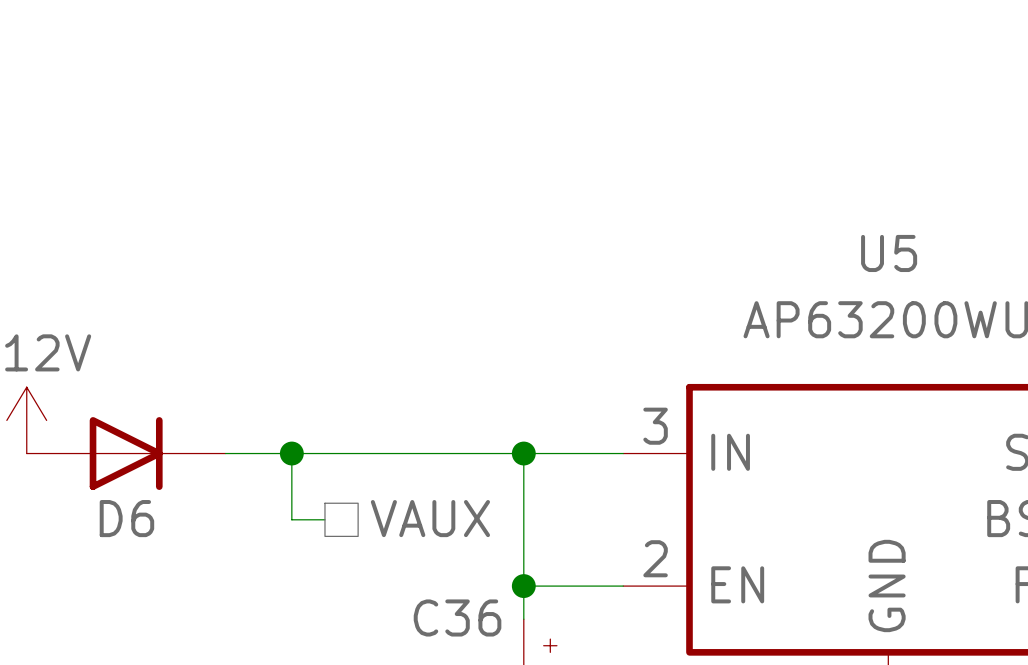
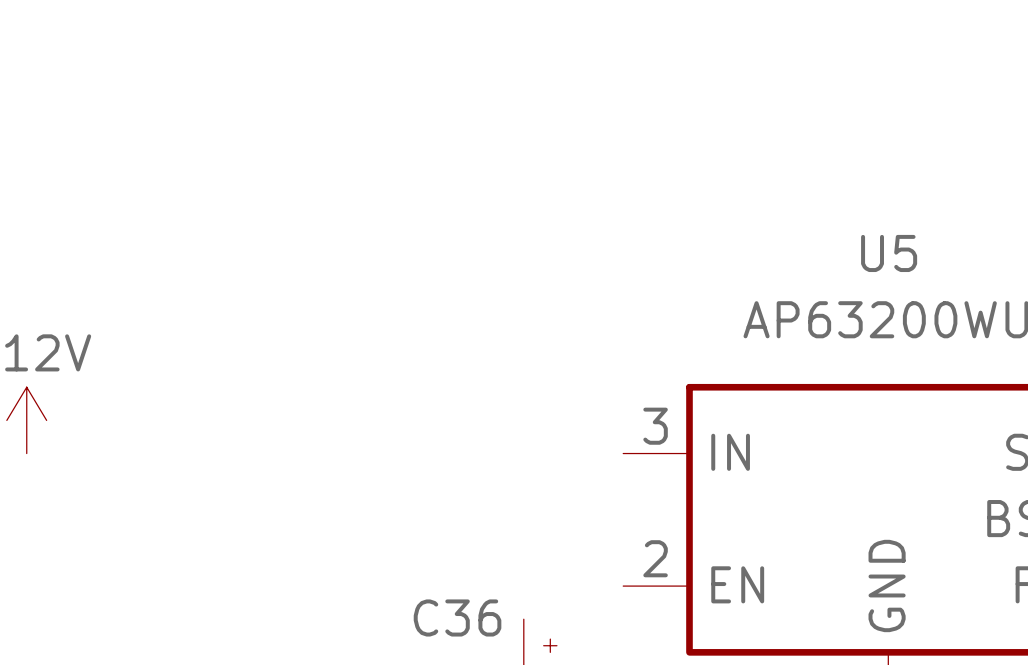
D6: (126, 453) -> none
wire: (225, 453) (623, 453) -> none
wire: (291, 453) (291, 519) (324, 519) -> none
junction: (291, 453) -> none
wire: (523, 453) (523, 619) -> none
junction: (523, 453) -> none
hierarchical label: VAUX (430, 518) -> none
wire: (523, 586) (623, 586) -> none
junction: (523, 586) -> none

